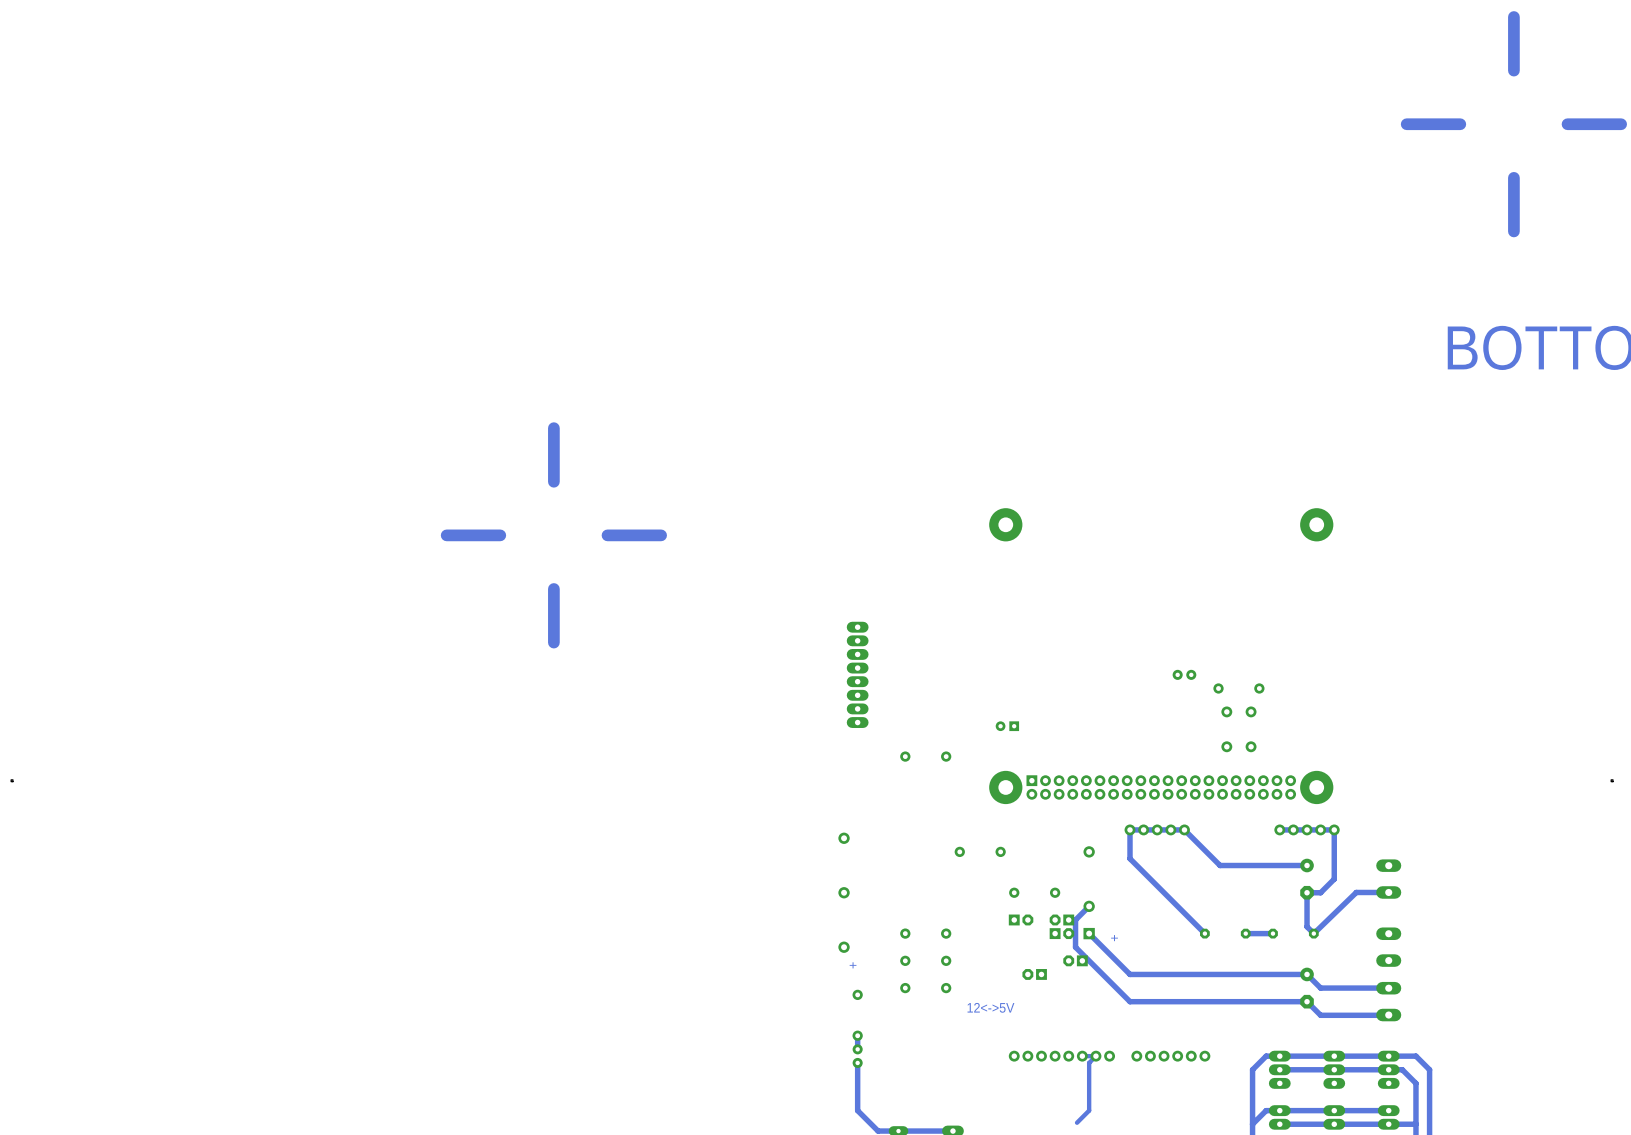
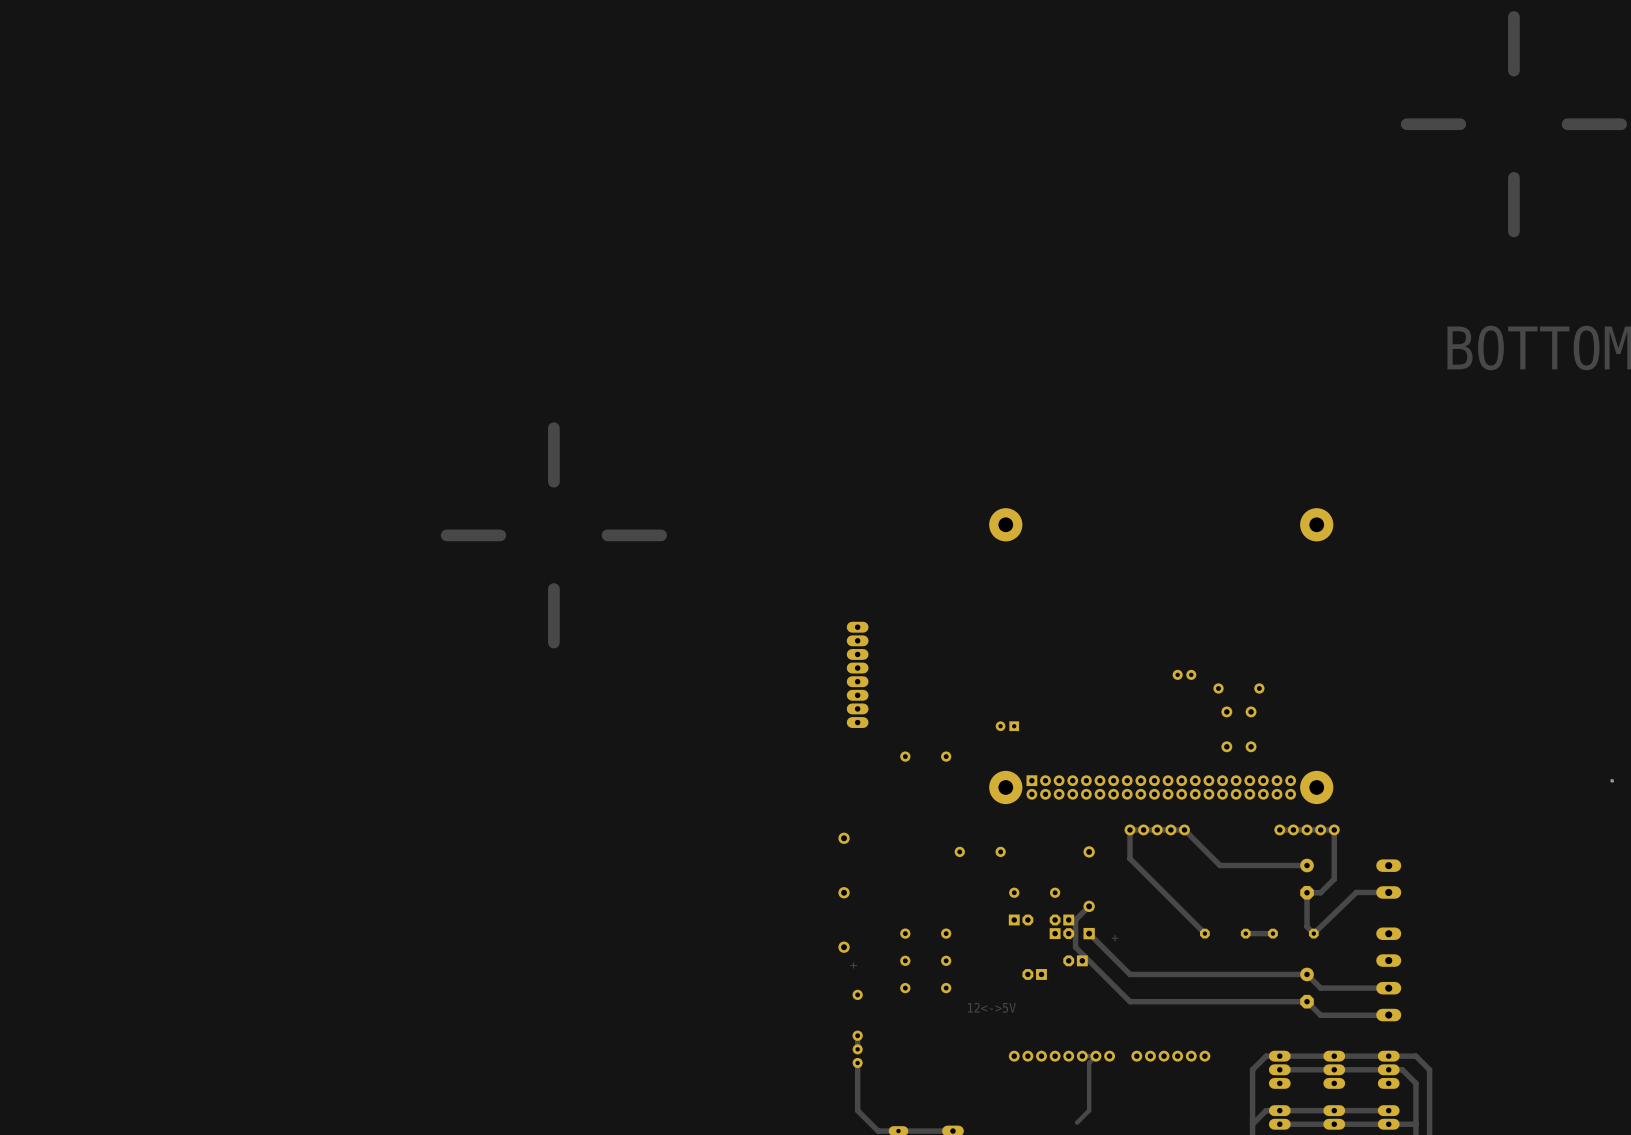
drawing: [11, 779, 13, 782] -> none

